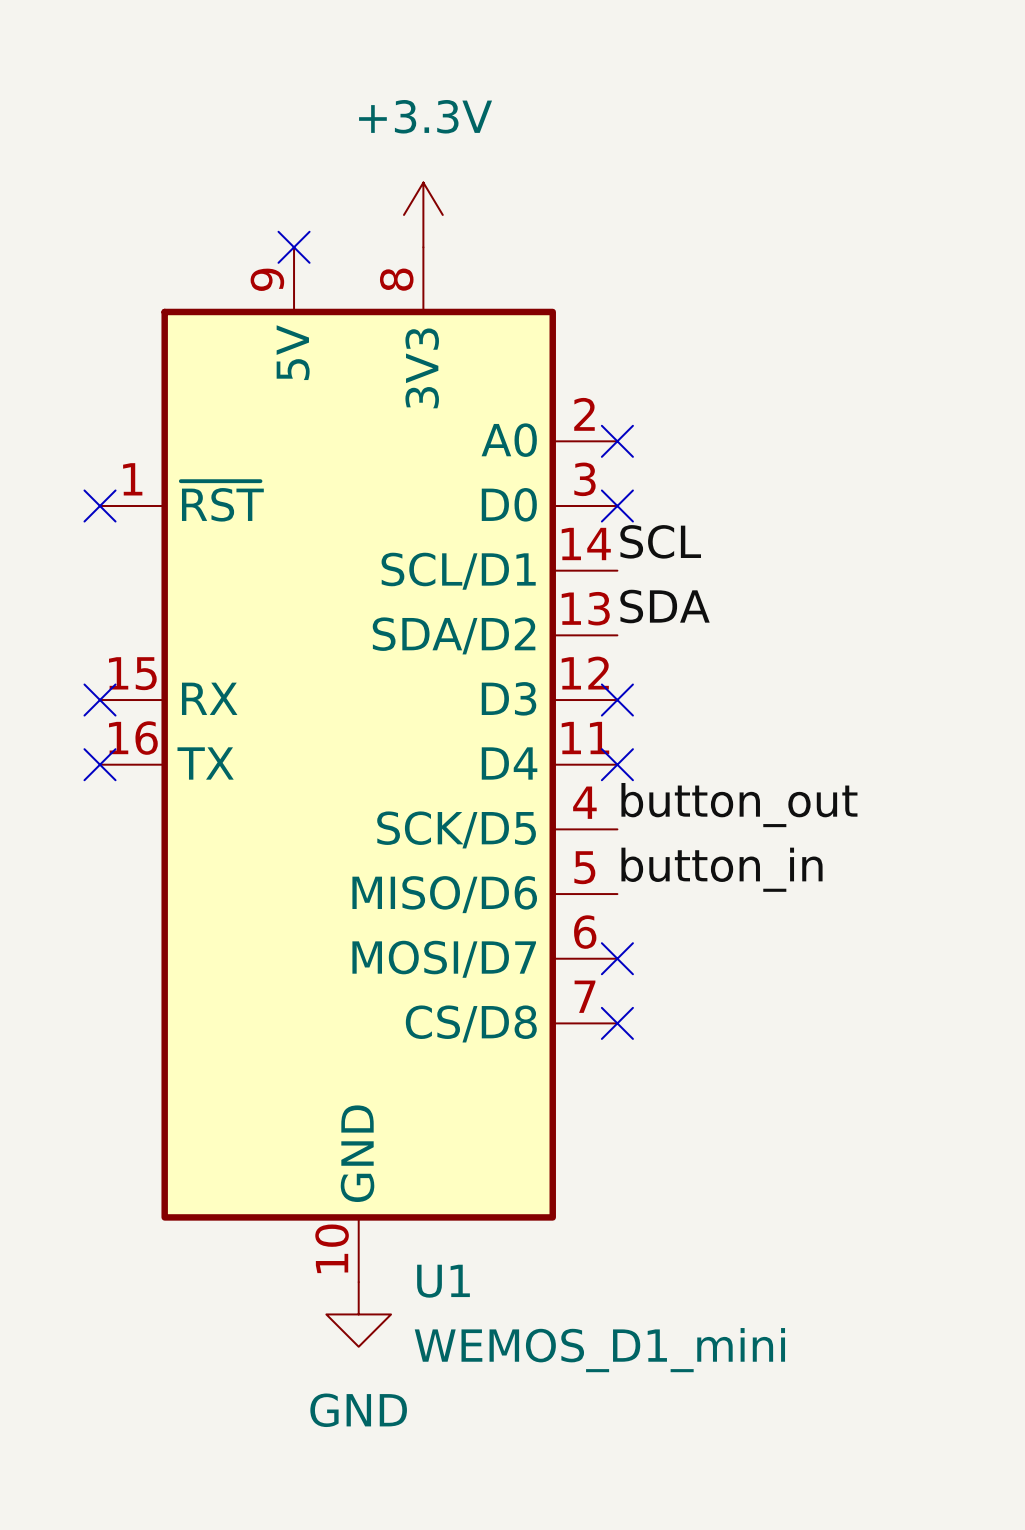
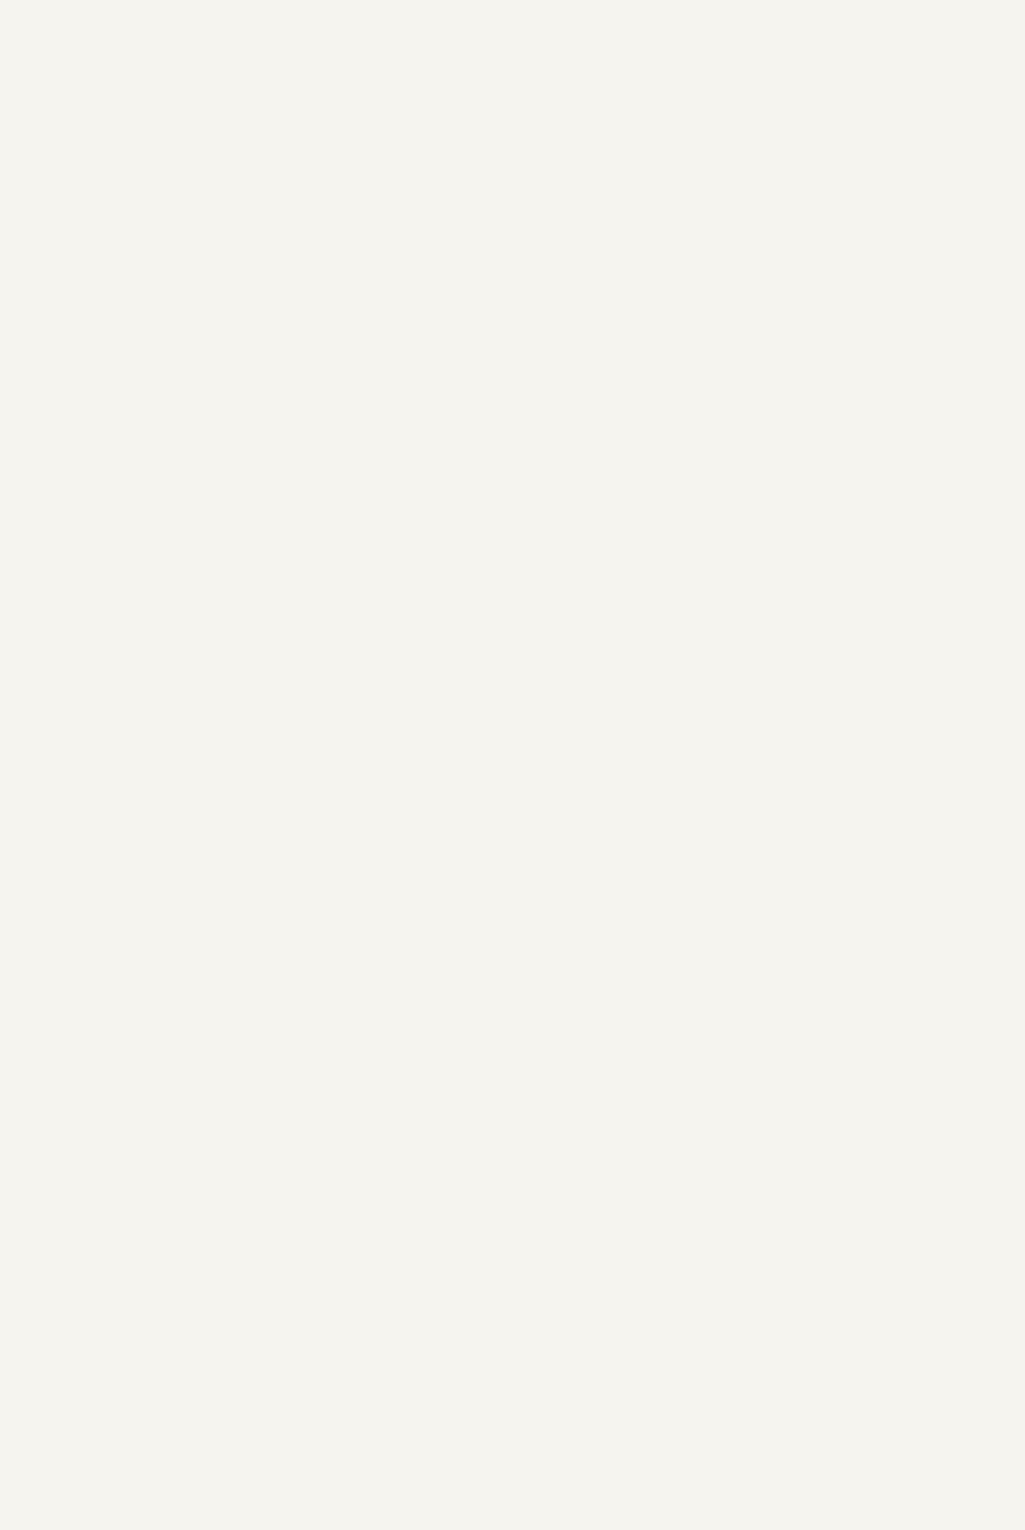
power symbol: +3.3V (423, 214) -> none
no-connect mark: (294, 247) -> none
no-connect mark: (617, 441) -> none
no-connect mark: (100, 506) -> none
no-connect mark: (617, 506) -> none
label: SCL (660, 541) -> none
label: SDA (665, 606) -> none
no-connect mark: (100, 700) -> none
no-connect mark: (617, 700) -> none
no-connect mark: (100, 764) -> none
U1: WEMOS_D1_mini (358, 764) -> none
no-connect mark: (617, 764) -> none
label: button_out (739, 805) -> none
label: button_in (722, 869) -> none
no-connect mark: (617, 958) -> none
no-connect mark: (617, 1023) -> none
power symbol: GND (358, 1314) -> none

